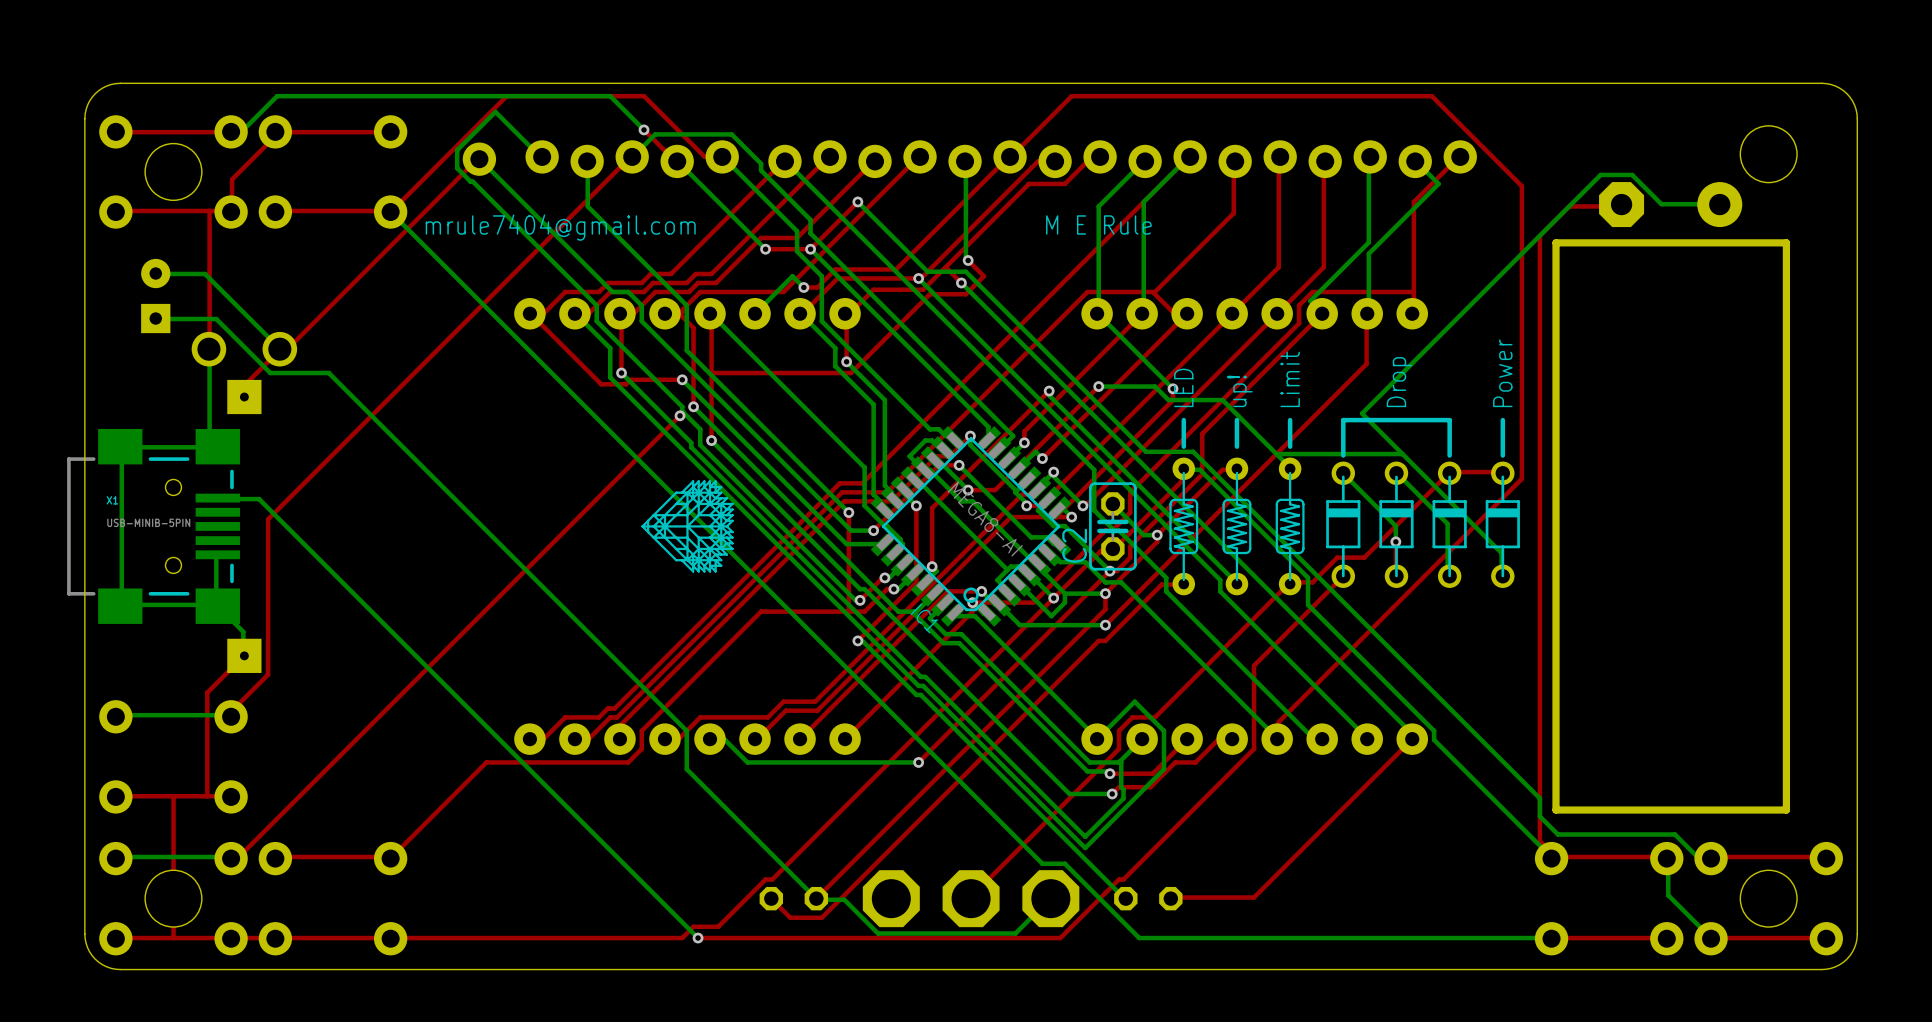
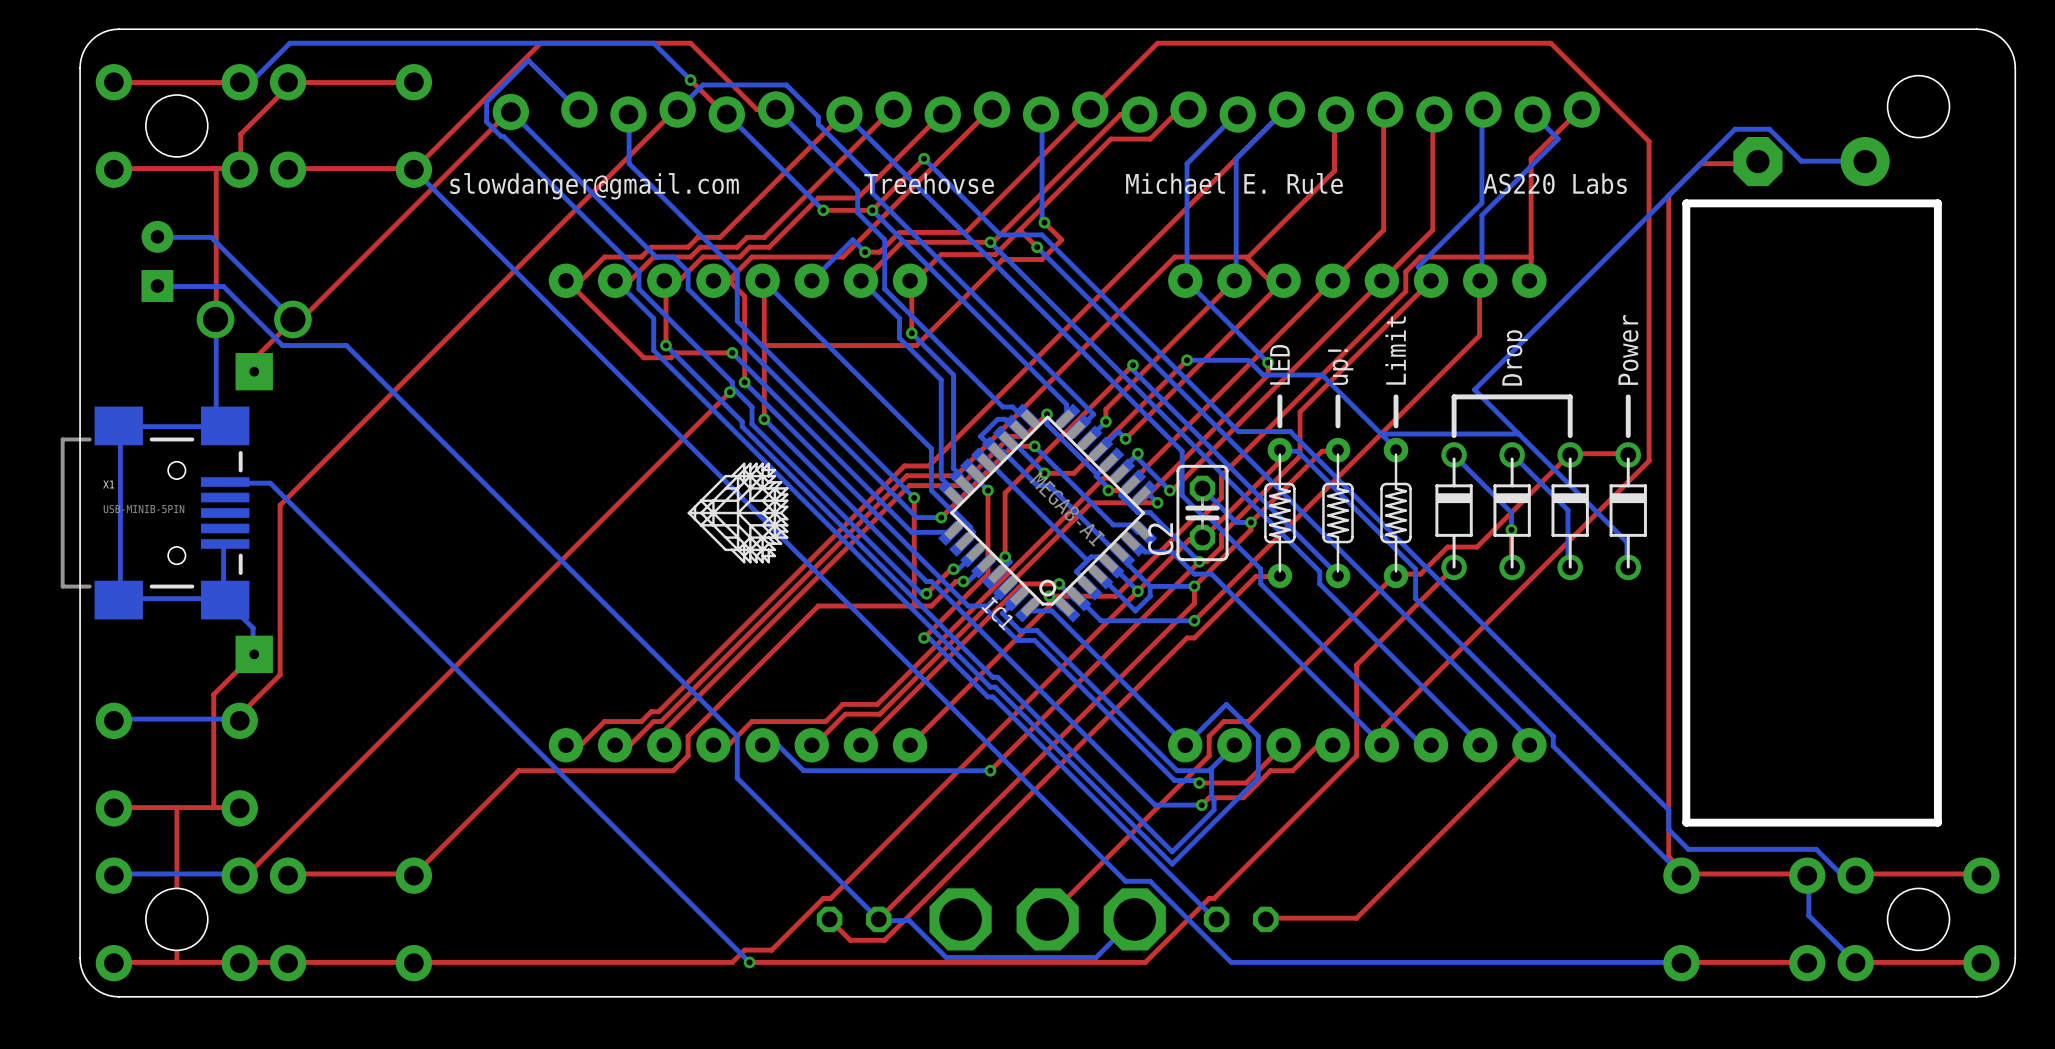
text: none -> Treehovse (929, 183)
text: M E Rule (1098, 224) -> Michael E. Rule (1234, 183)
text: none -> AS220 Labs (1555, 183)
text: mrule7404@gmail.com (560, 227) -> slowdanger@gmail.com (594, 186)

